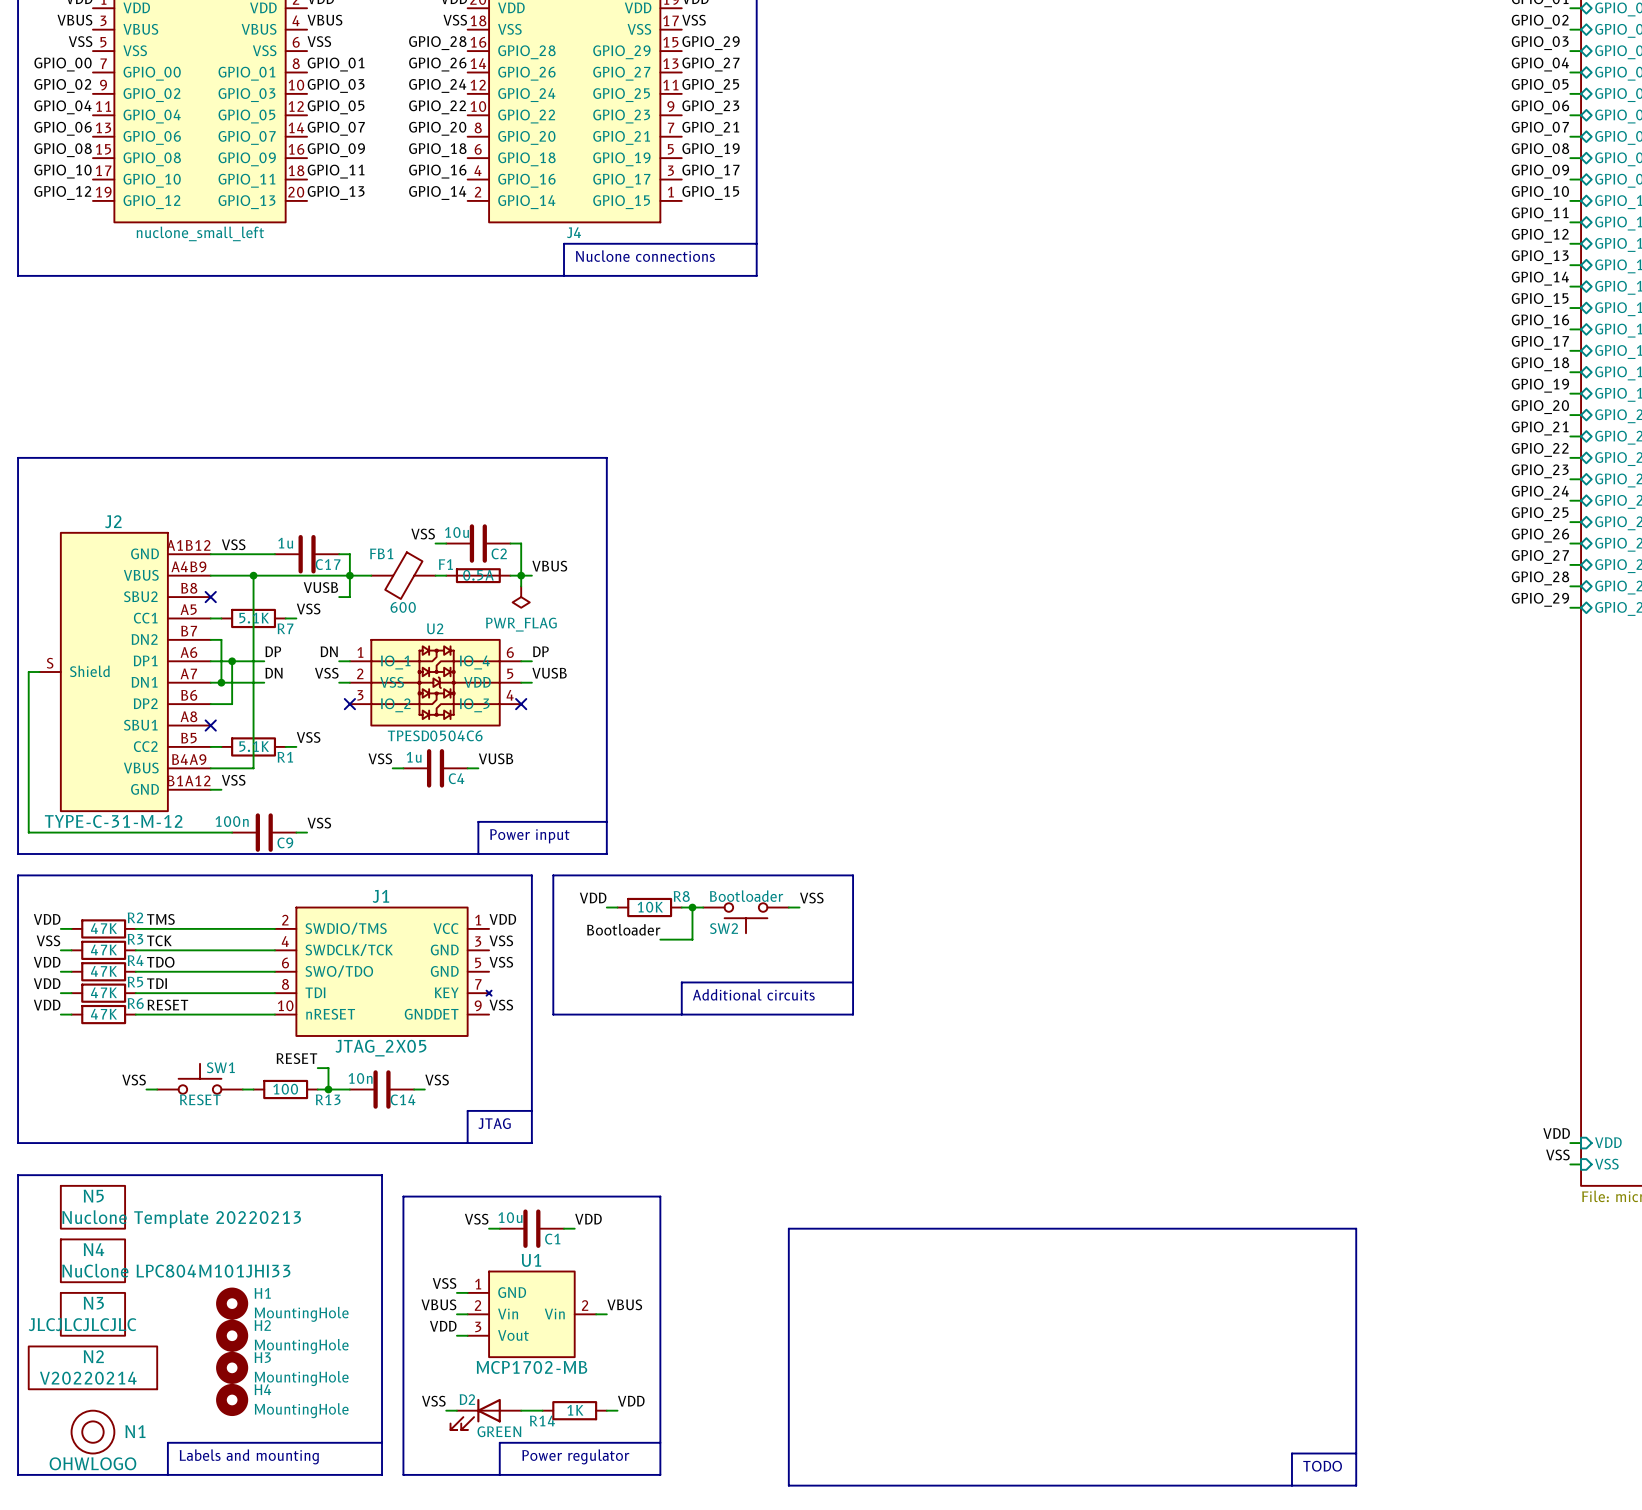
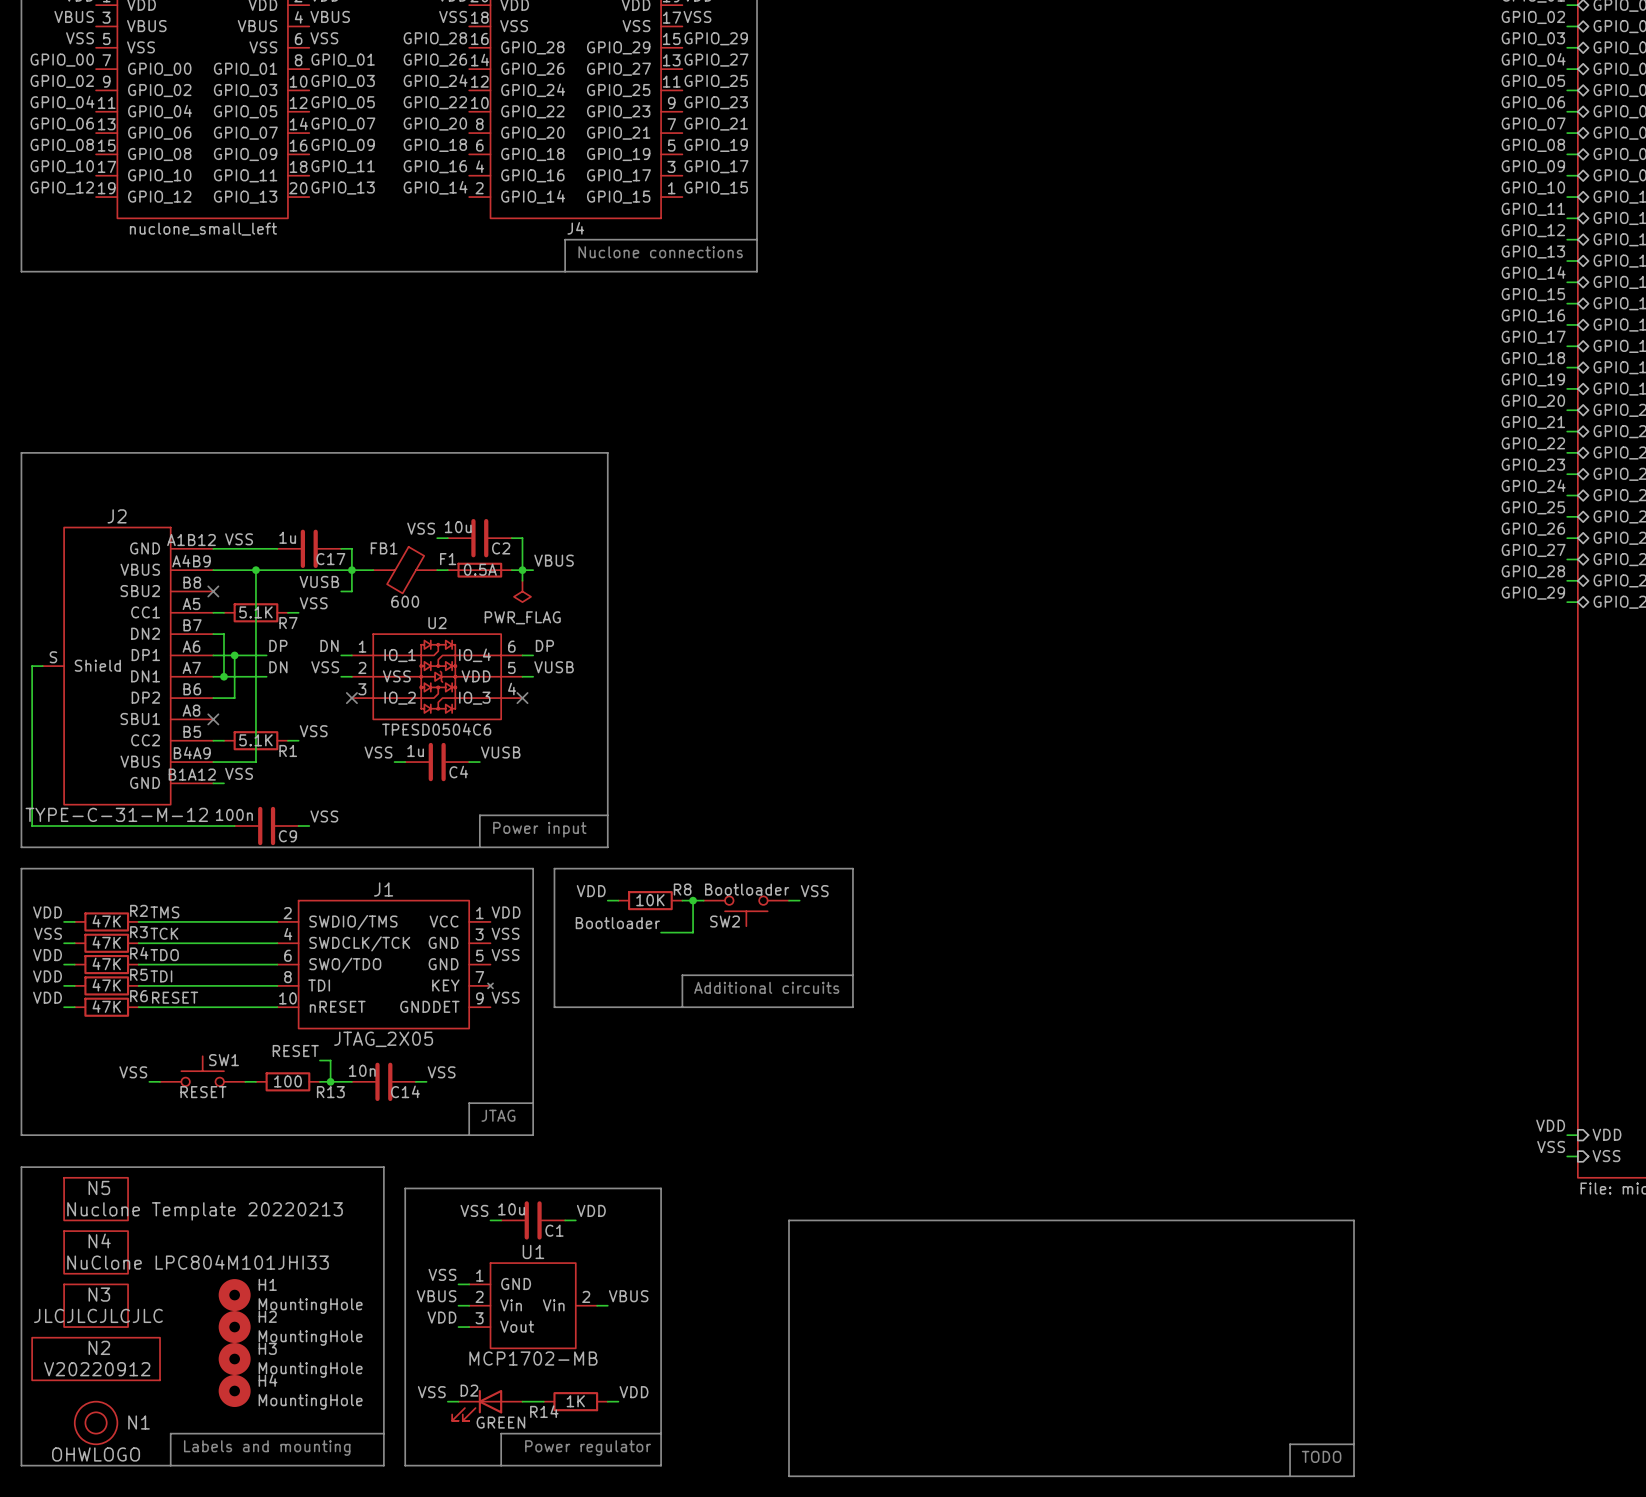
N2 value: V20220214 (88, 1378) -> V20220912 (97, 1369)

